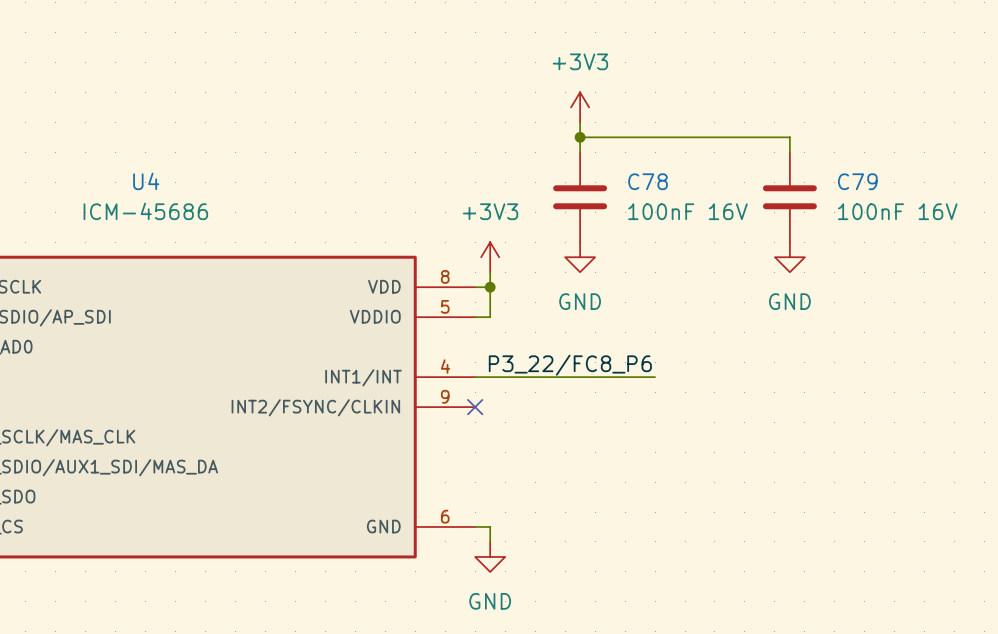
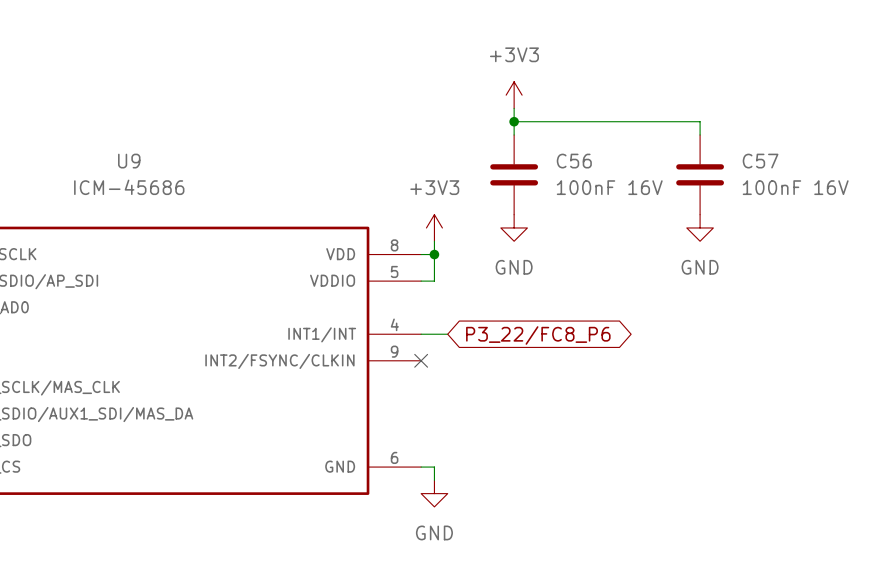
U4 name: U4 (146, 181) -> U9 (129, 161)
C78 name: C78 (648, 181) -> C56 (574, 161)
C79 name: C79 (857, 181) -> C57 (760, 161)
label: P3_22/FC8_P6 (570, 365) -> none
wire: (505, 377) (655, 377) -> none
global label: none -> P3_22/FC8_P6 (538, 335)

